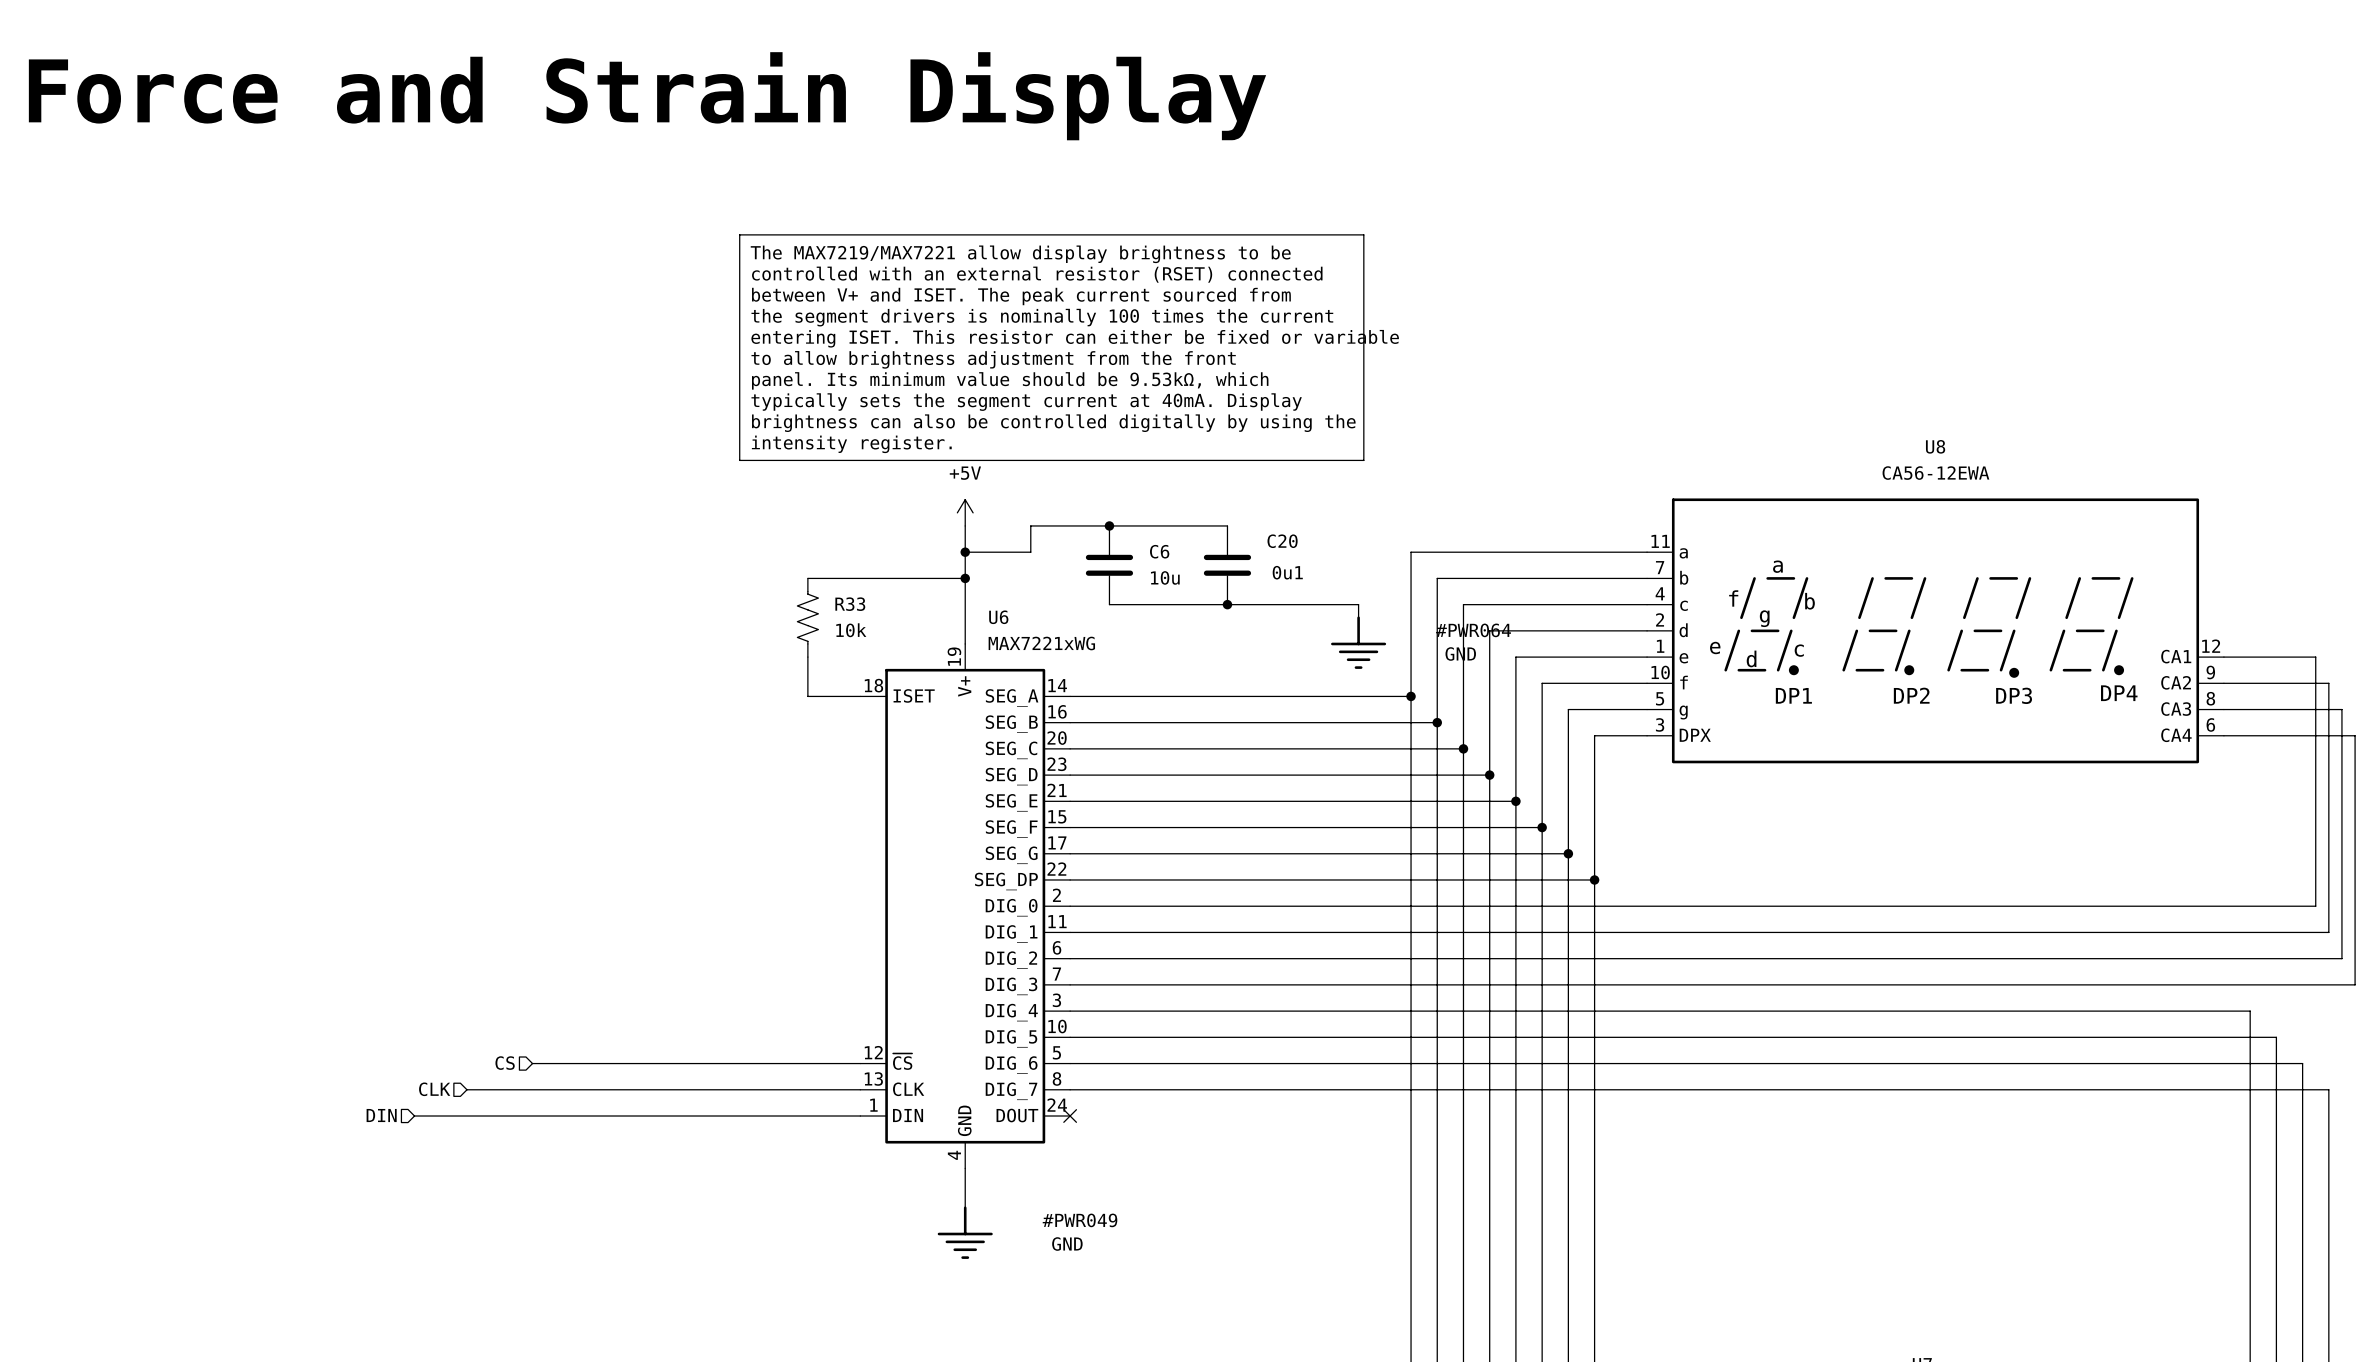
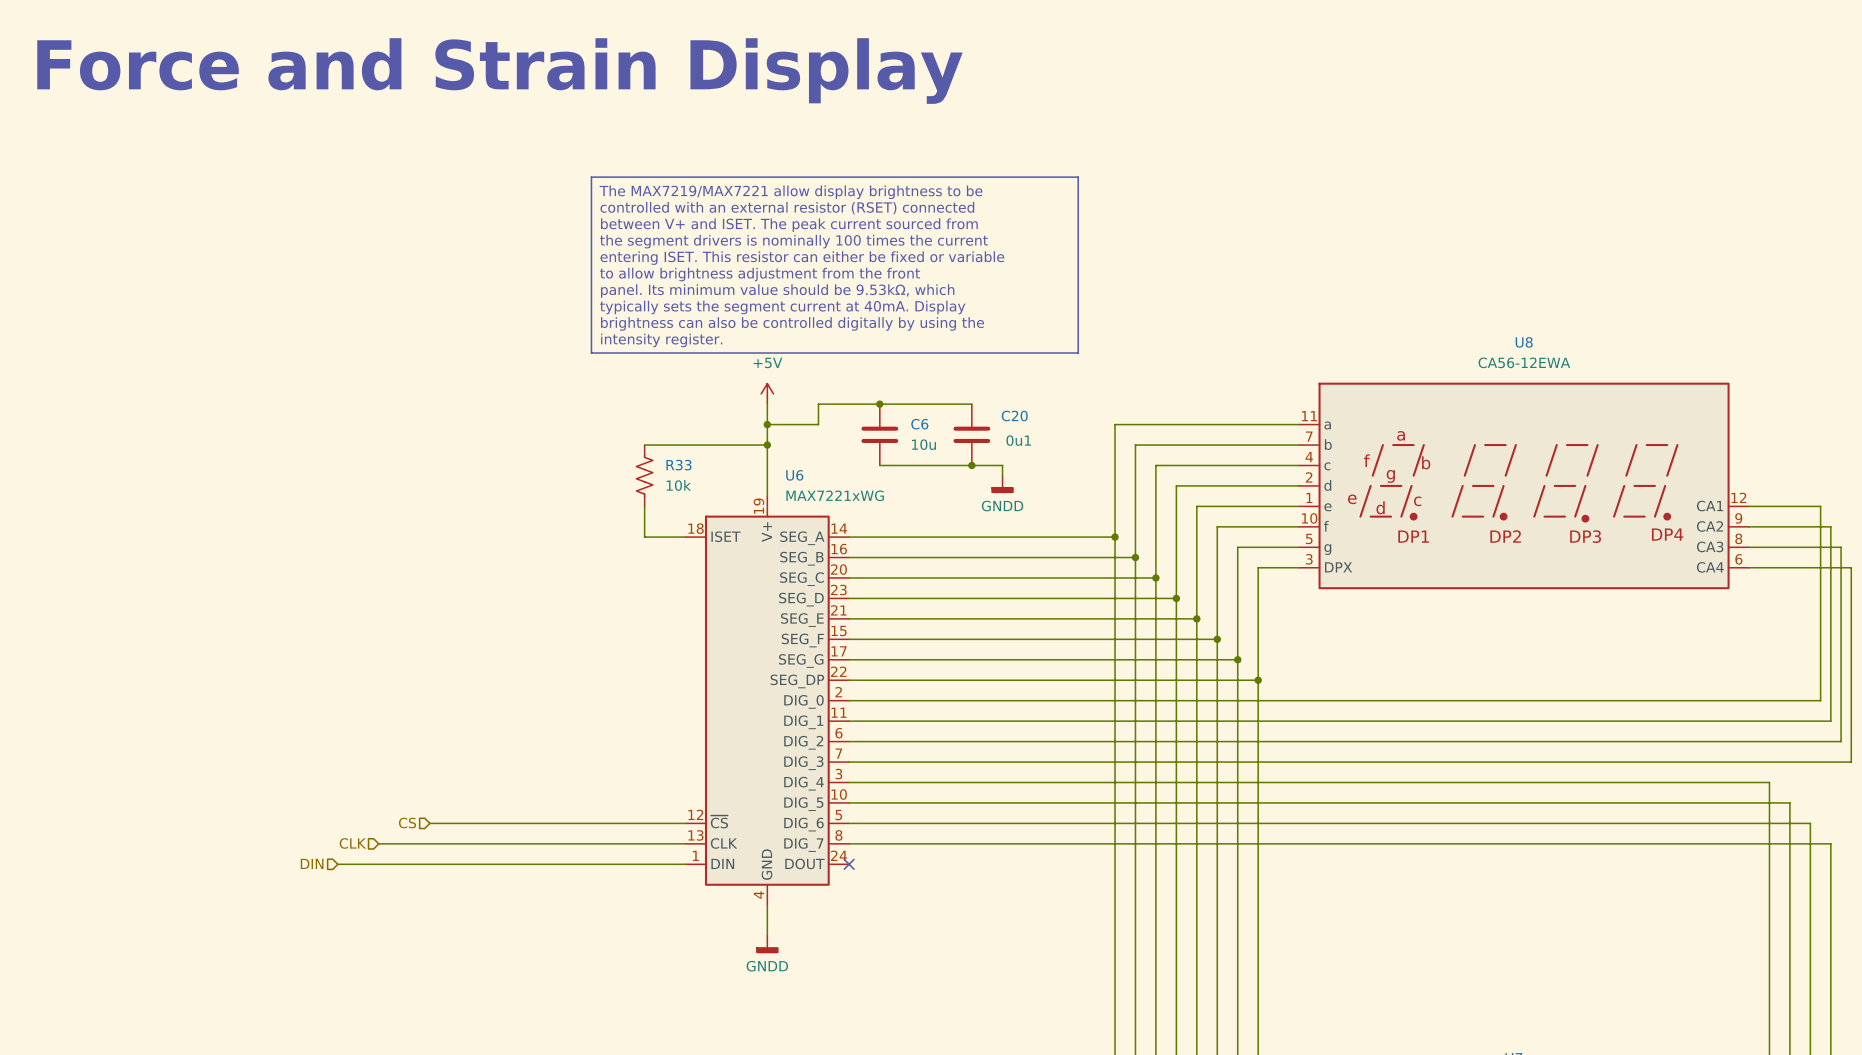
wire: (1266, 604) (1358, 604) (1358, 617) -> (1002, 465) (1002, 475)
power symbol: none -> GNDD (1002, 484)
#PWR064: GND (1358, 642) -> none
power symbol: none -> GNDD (767, 944)
#PWR049: GND (965, 1232) -> none

